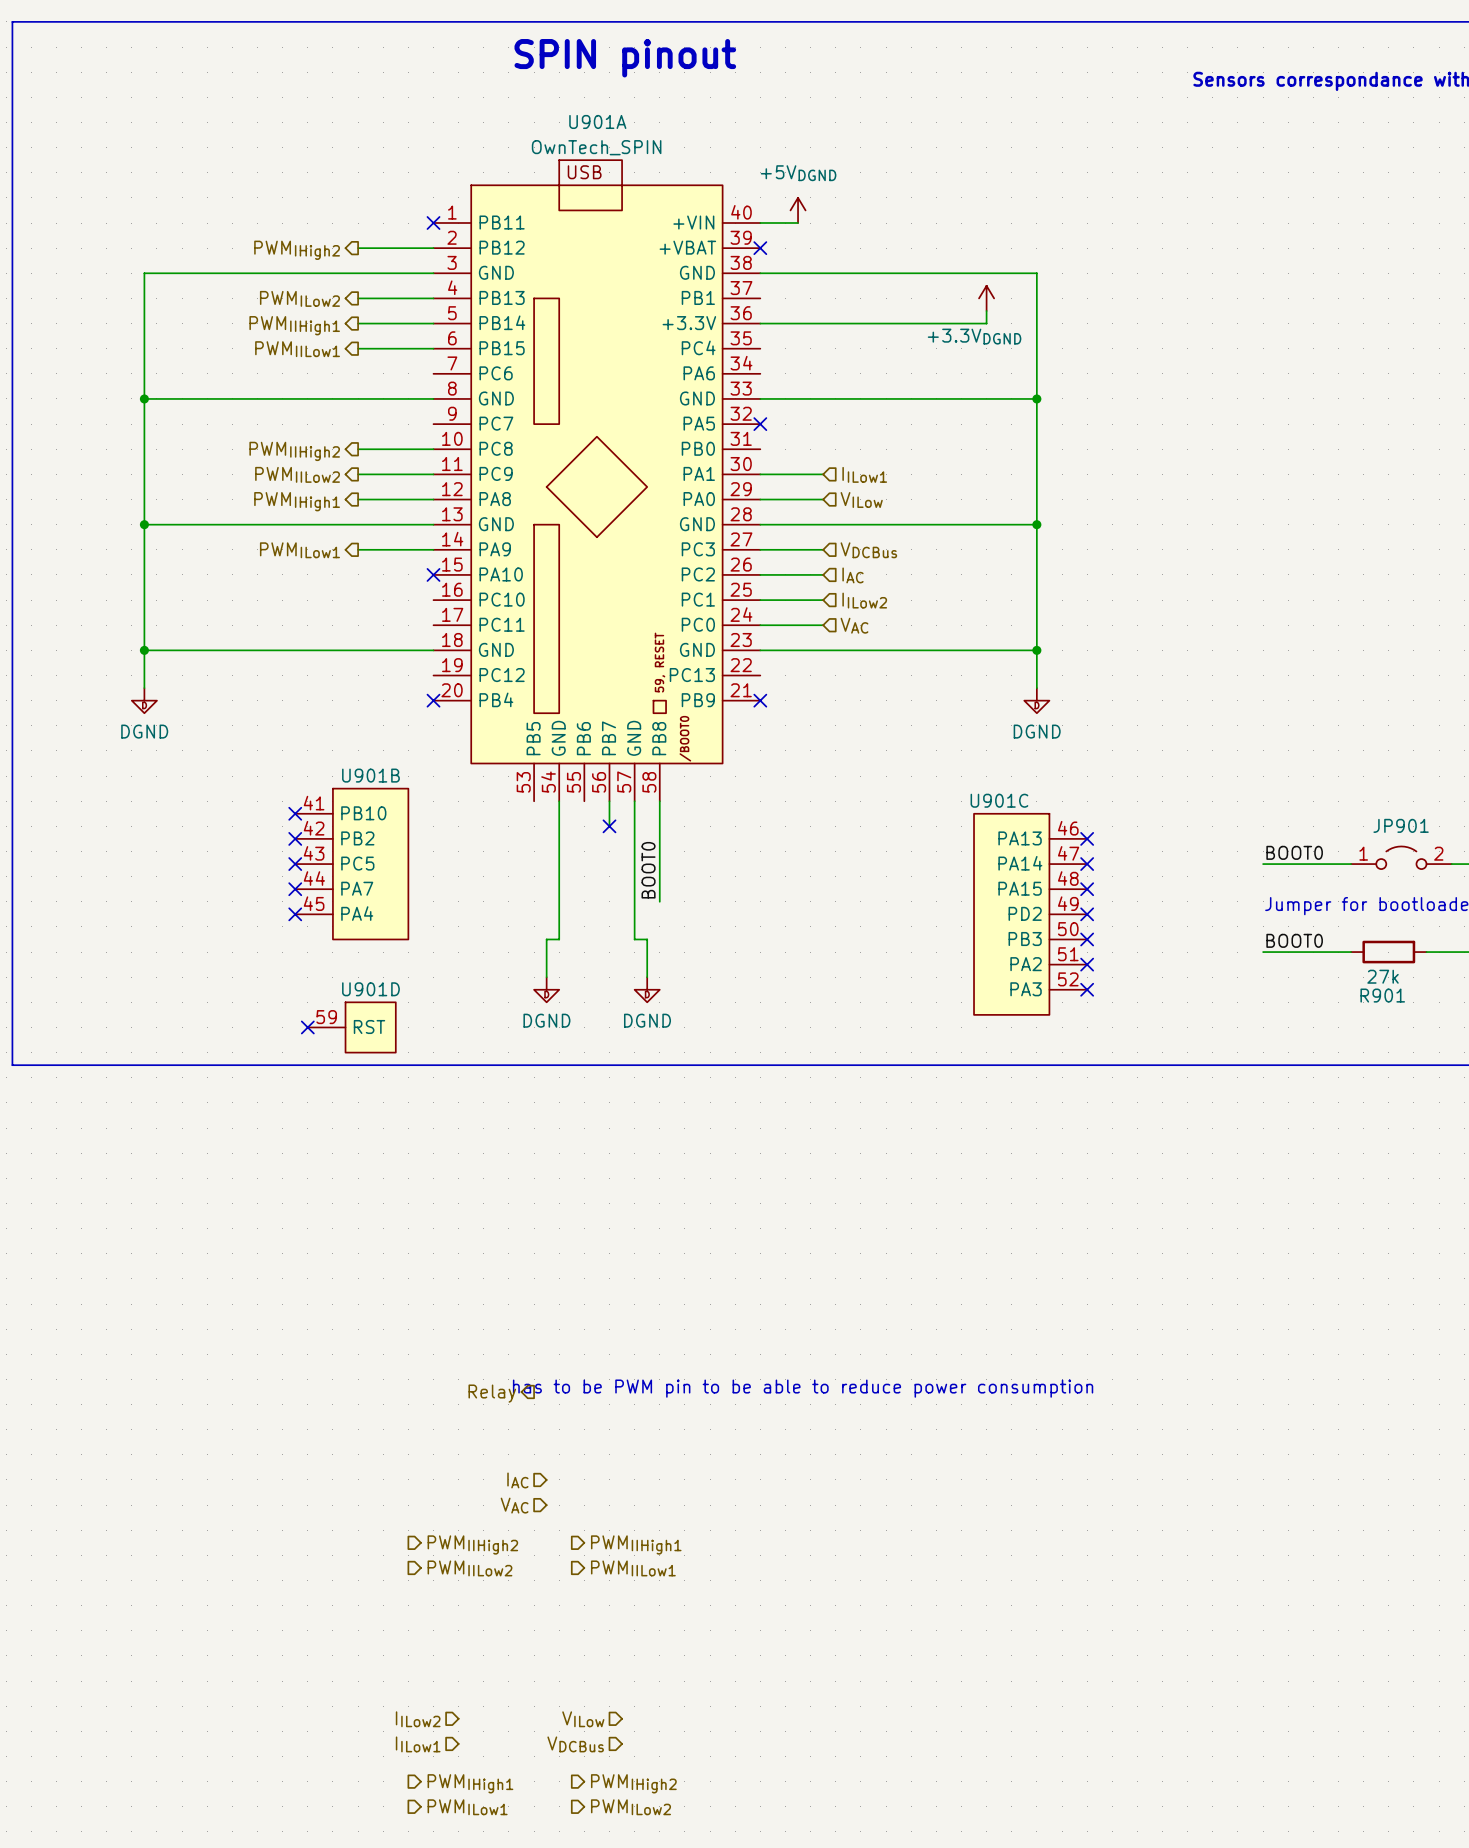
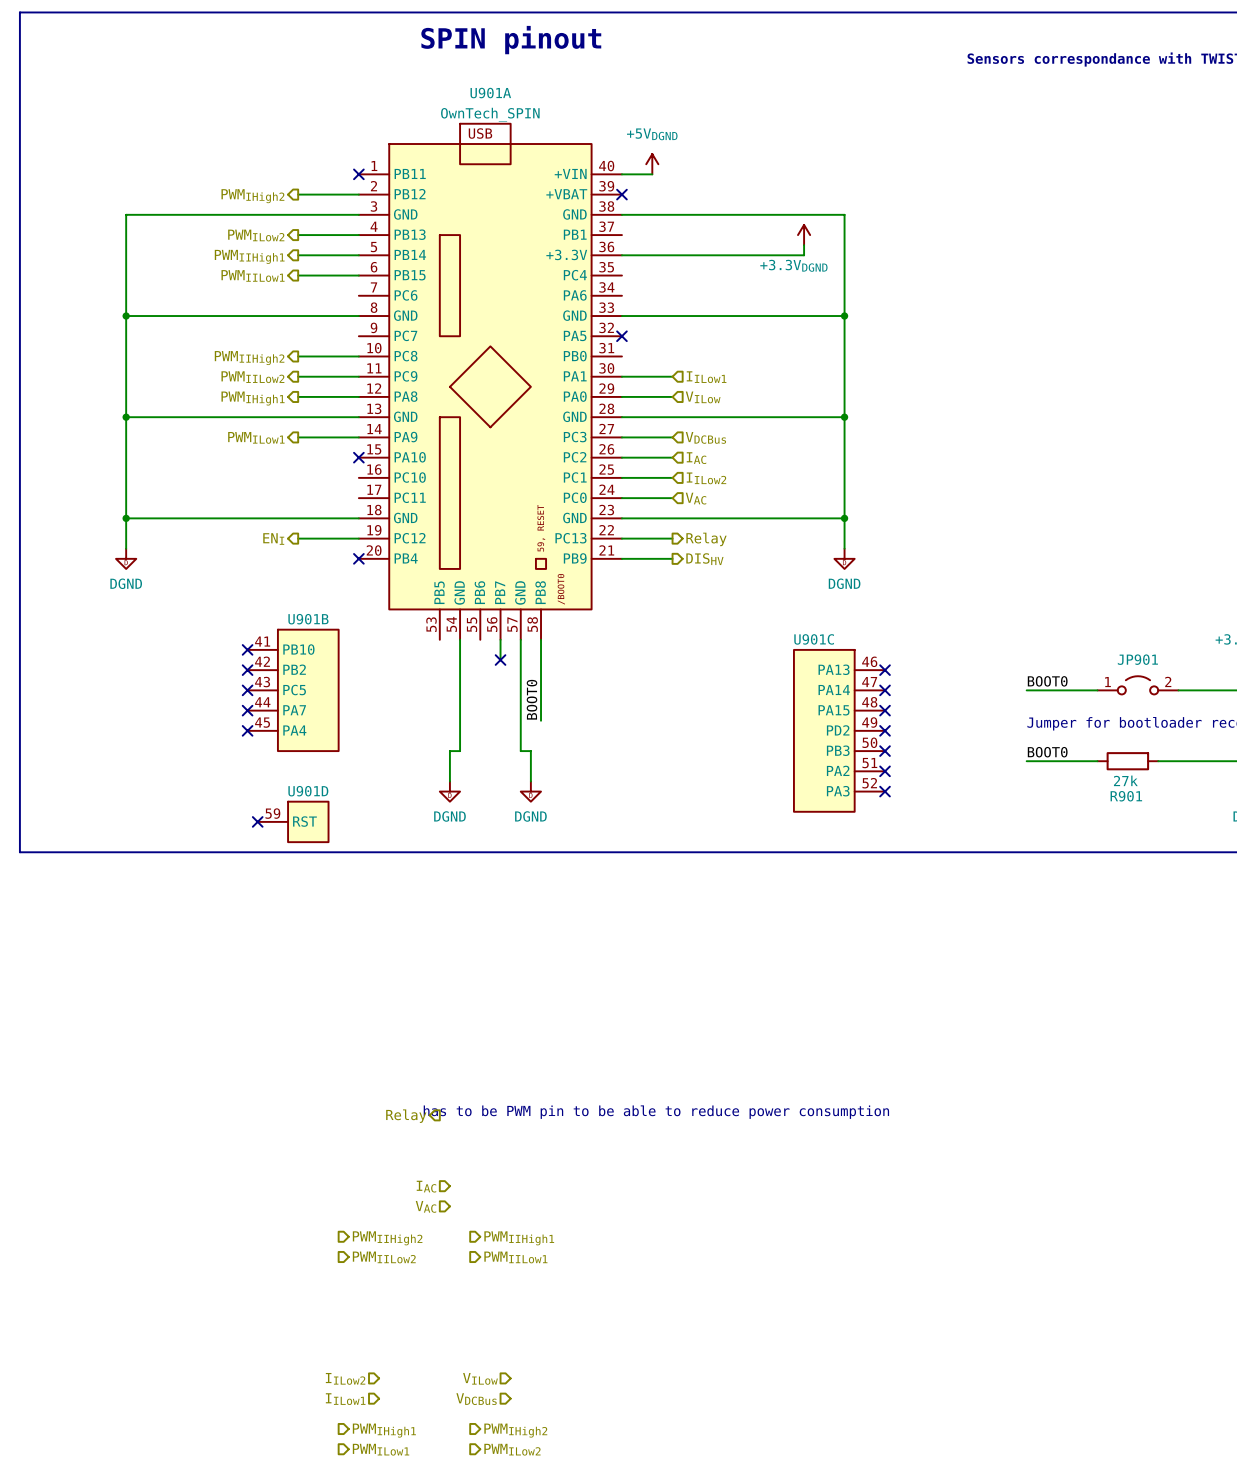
hierarchical label: none -> ENI (273, 538)
wire: none -> (298, 538) (358, 538)
wire: none -> (621, 538) (672, 538)
hierarchical label: none -> Relay (706, 539)
wire: none -> (621, 558) (672, 558)
no-connect mark: (760, 700) -> none
hierarchical label: none -> DISHV (704, 559)

